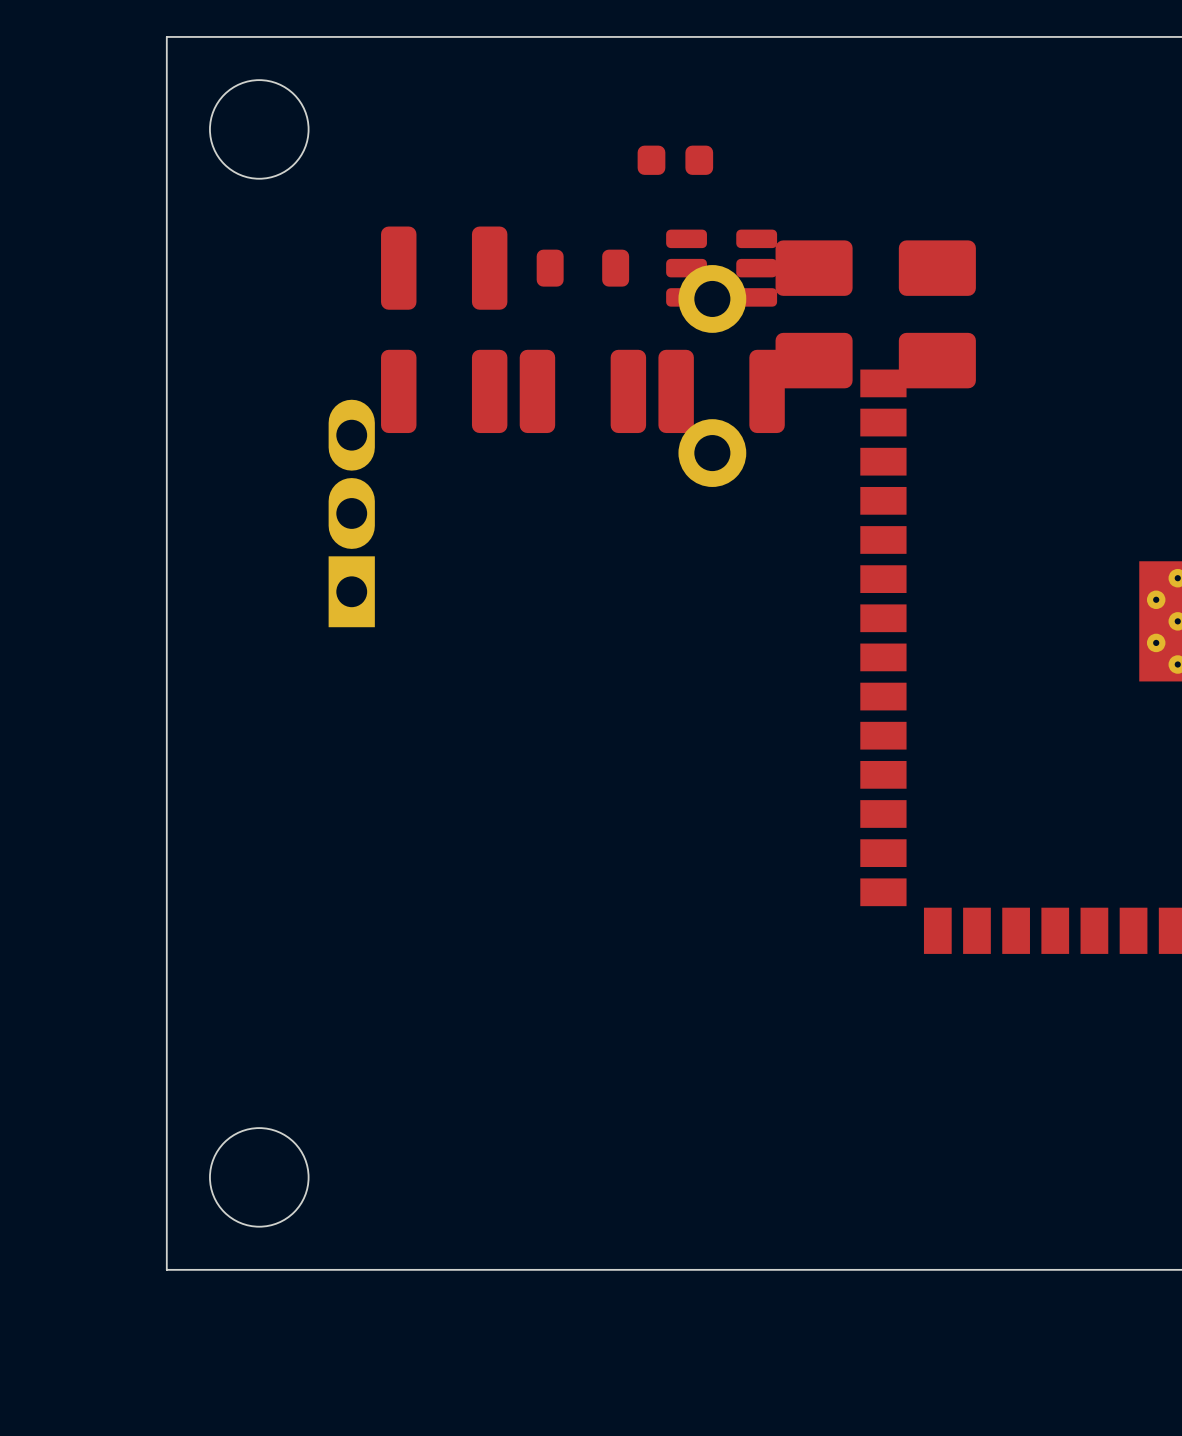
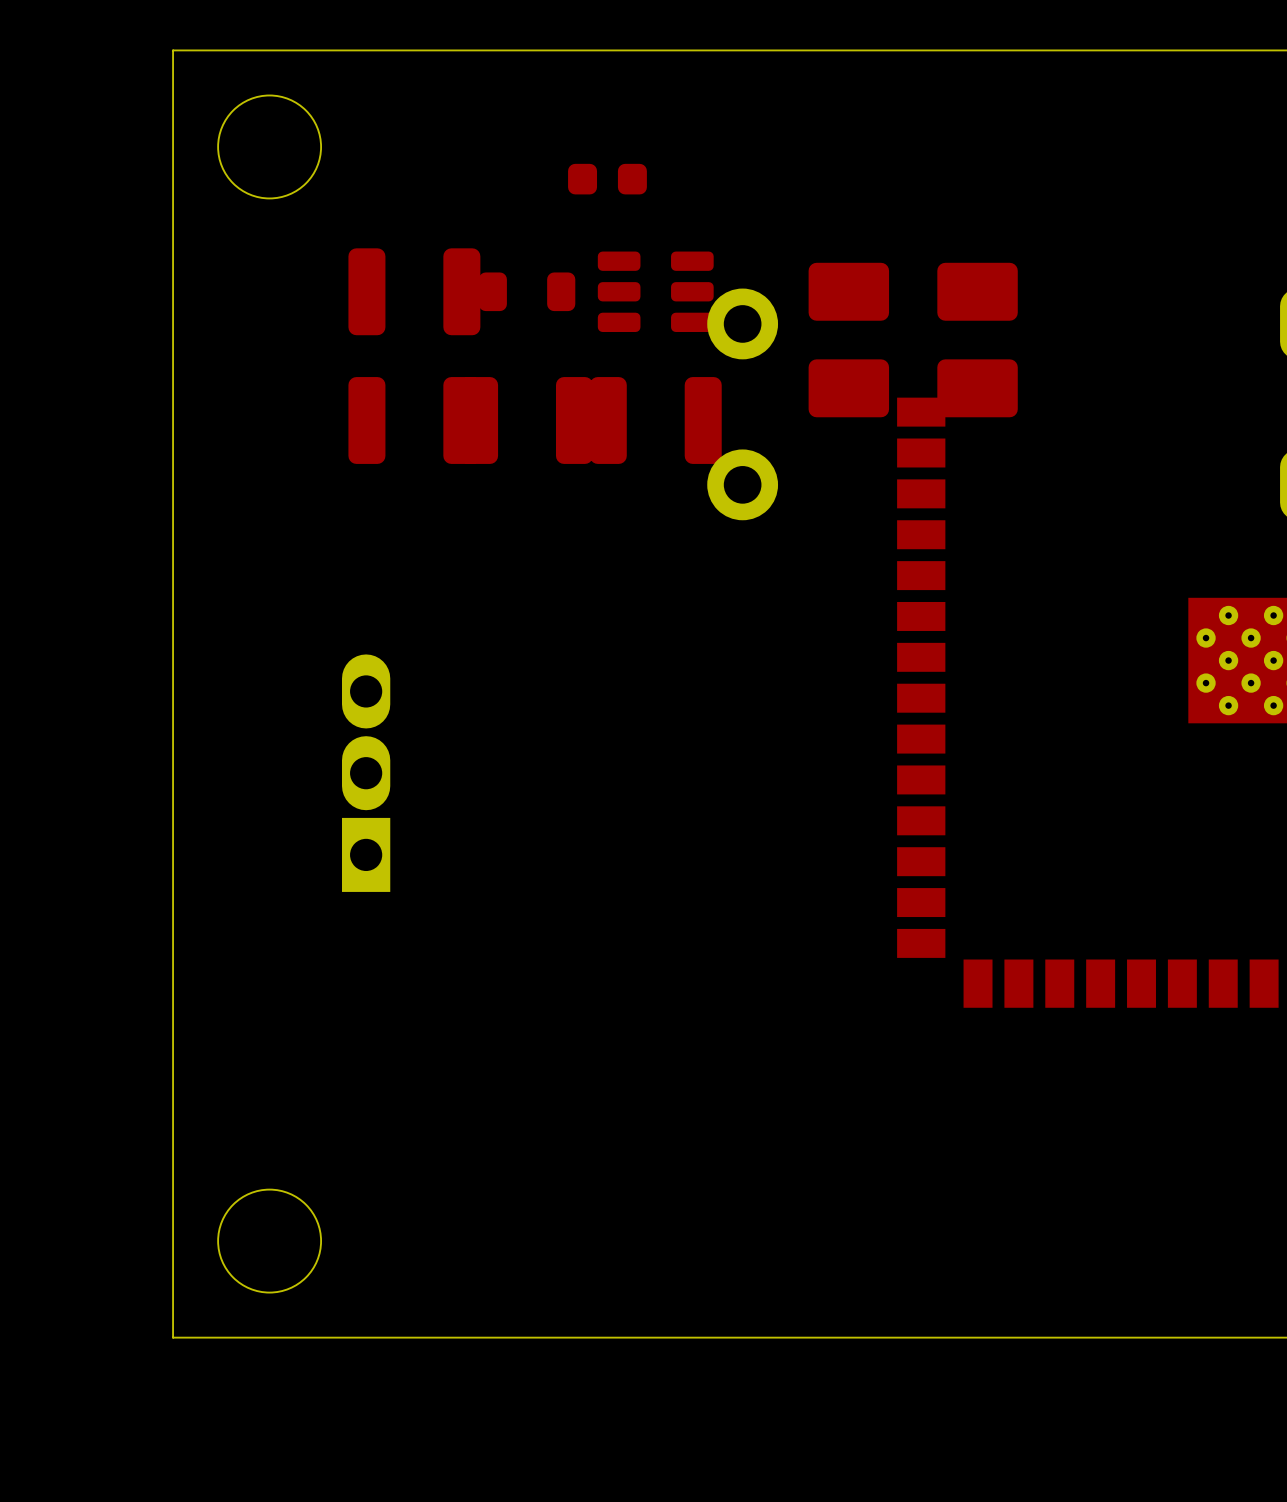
part position: (675, 160) -> (607, 179)
part position: (444, 268) -> (414, 291)
part position: (582, 268) -> (527, 291)
part position: (721, 268) -> (655, 291)
part: none -> (414, 420)
part: (444, 391) -> none
part: none -> (527, 420)
part: (582, 391) -> none
part: none -> (655, 420)
part: (721, 391) -> none
part position: (351, 513) -> (366, 773)

